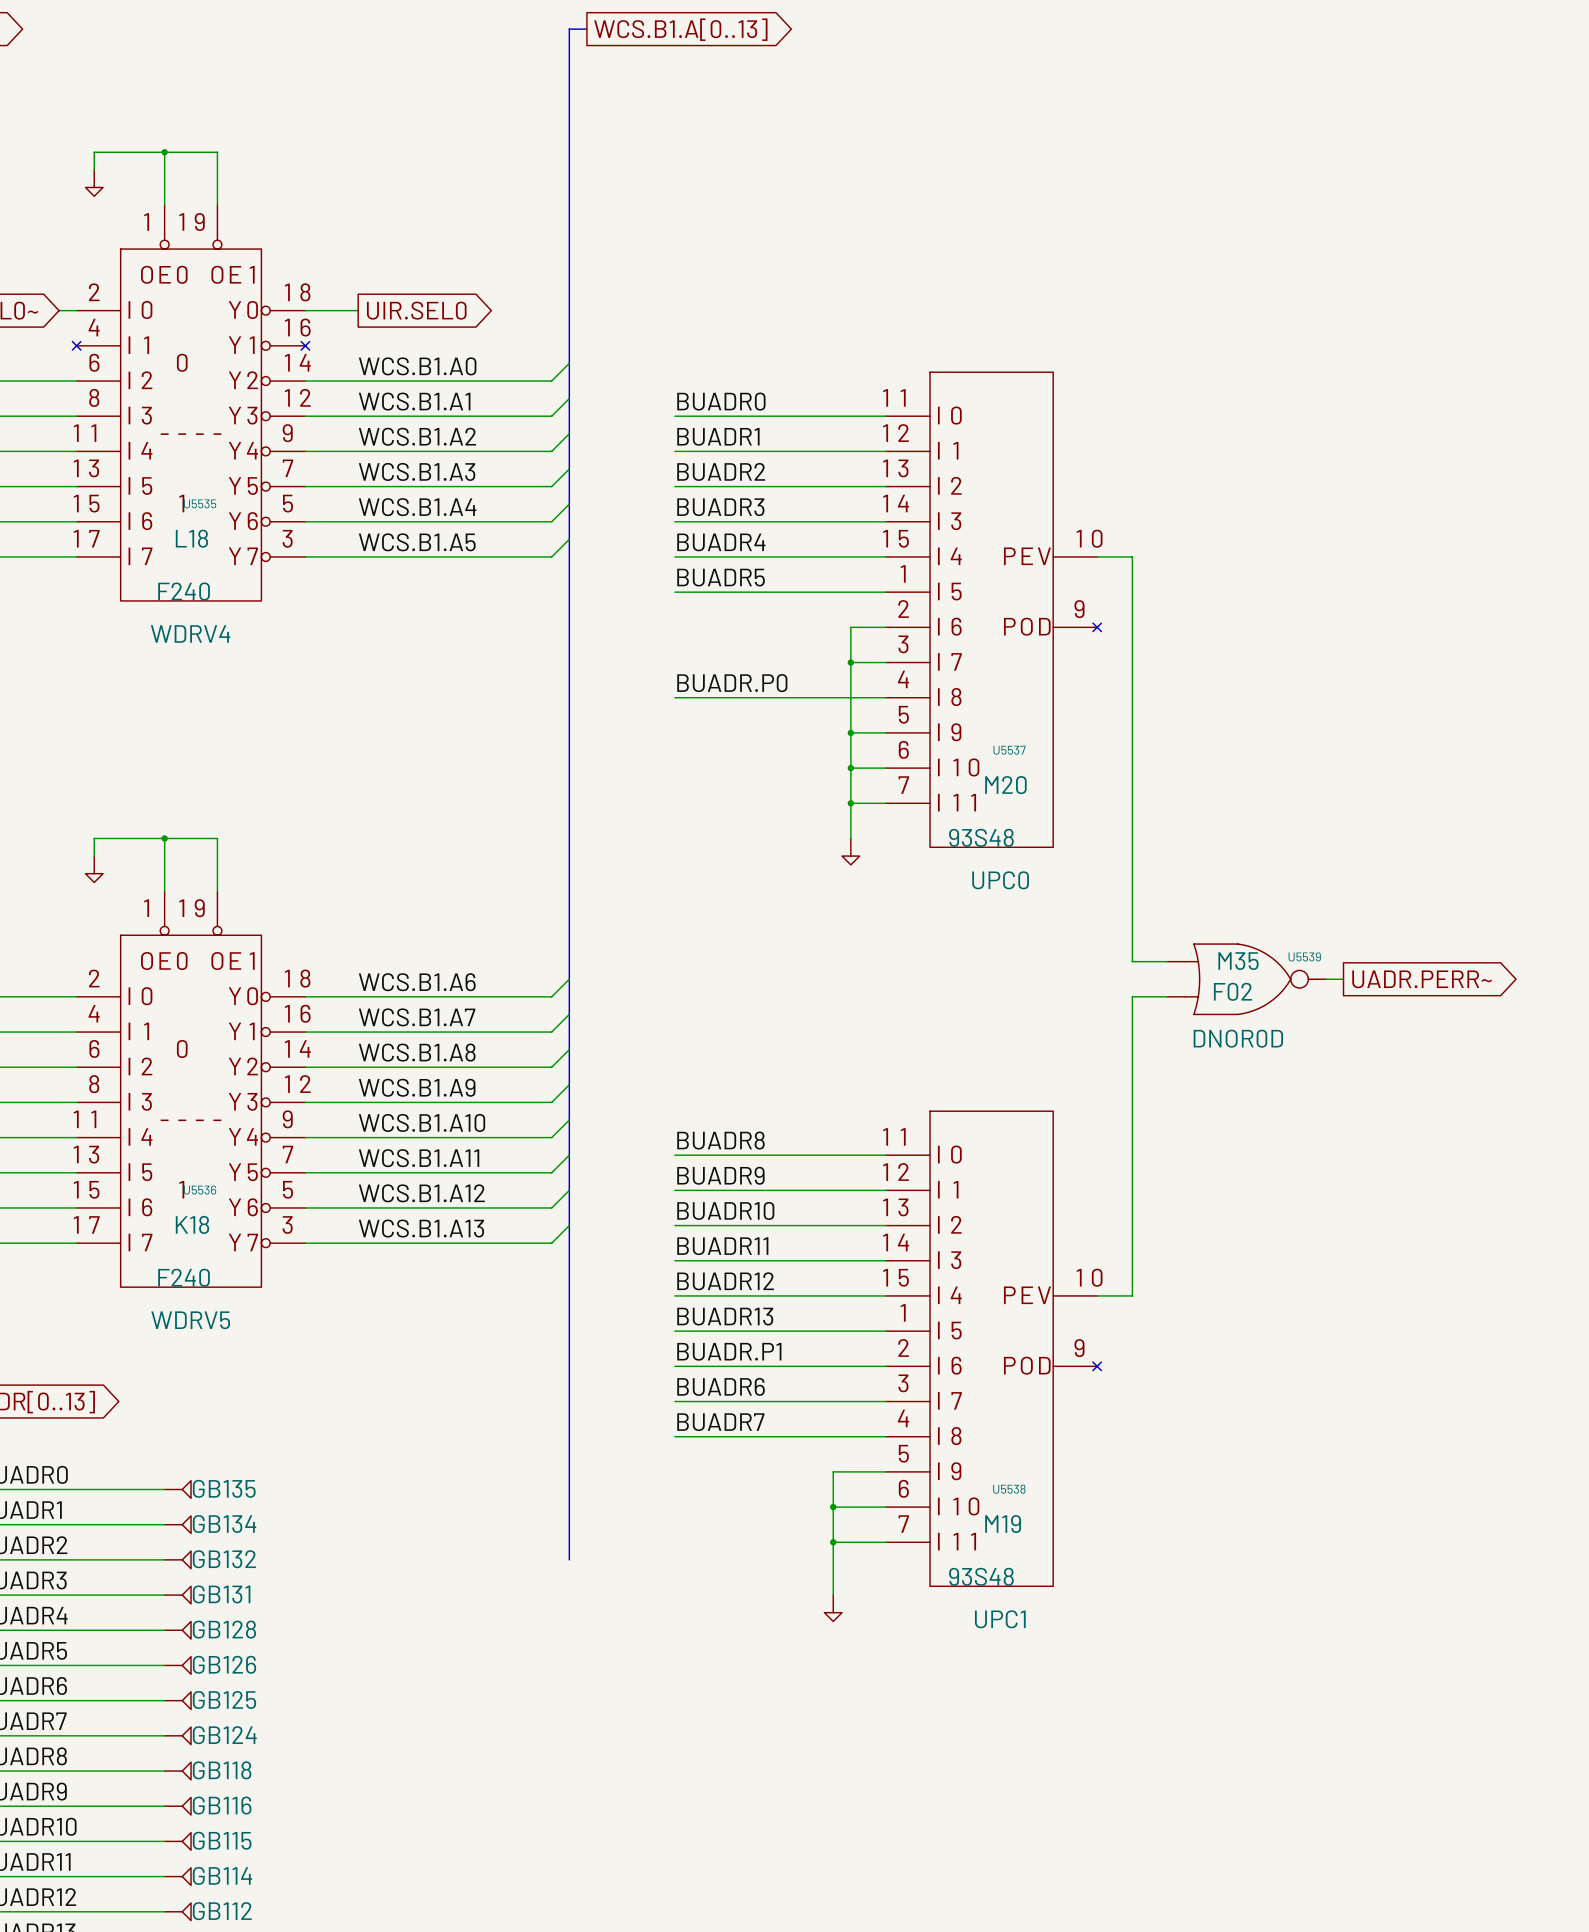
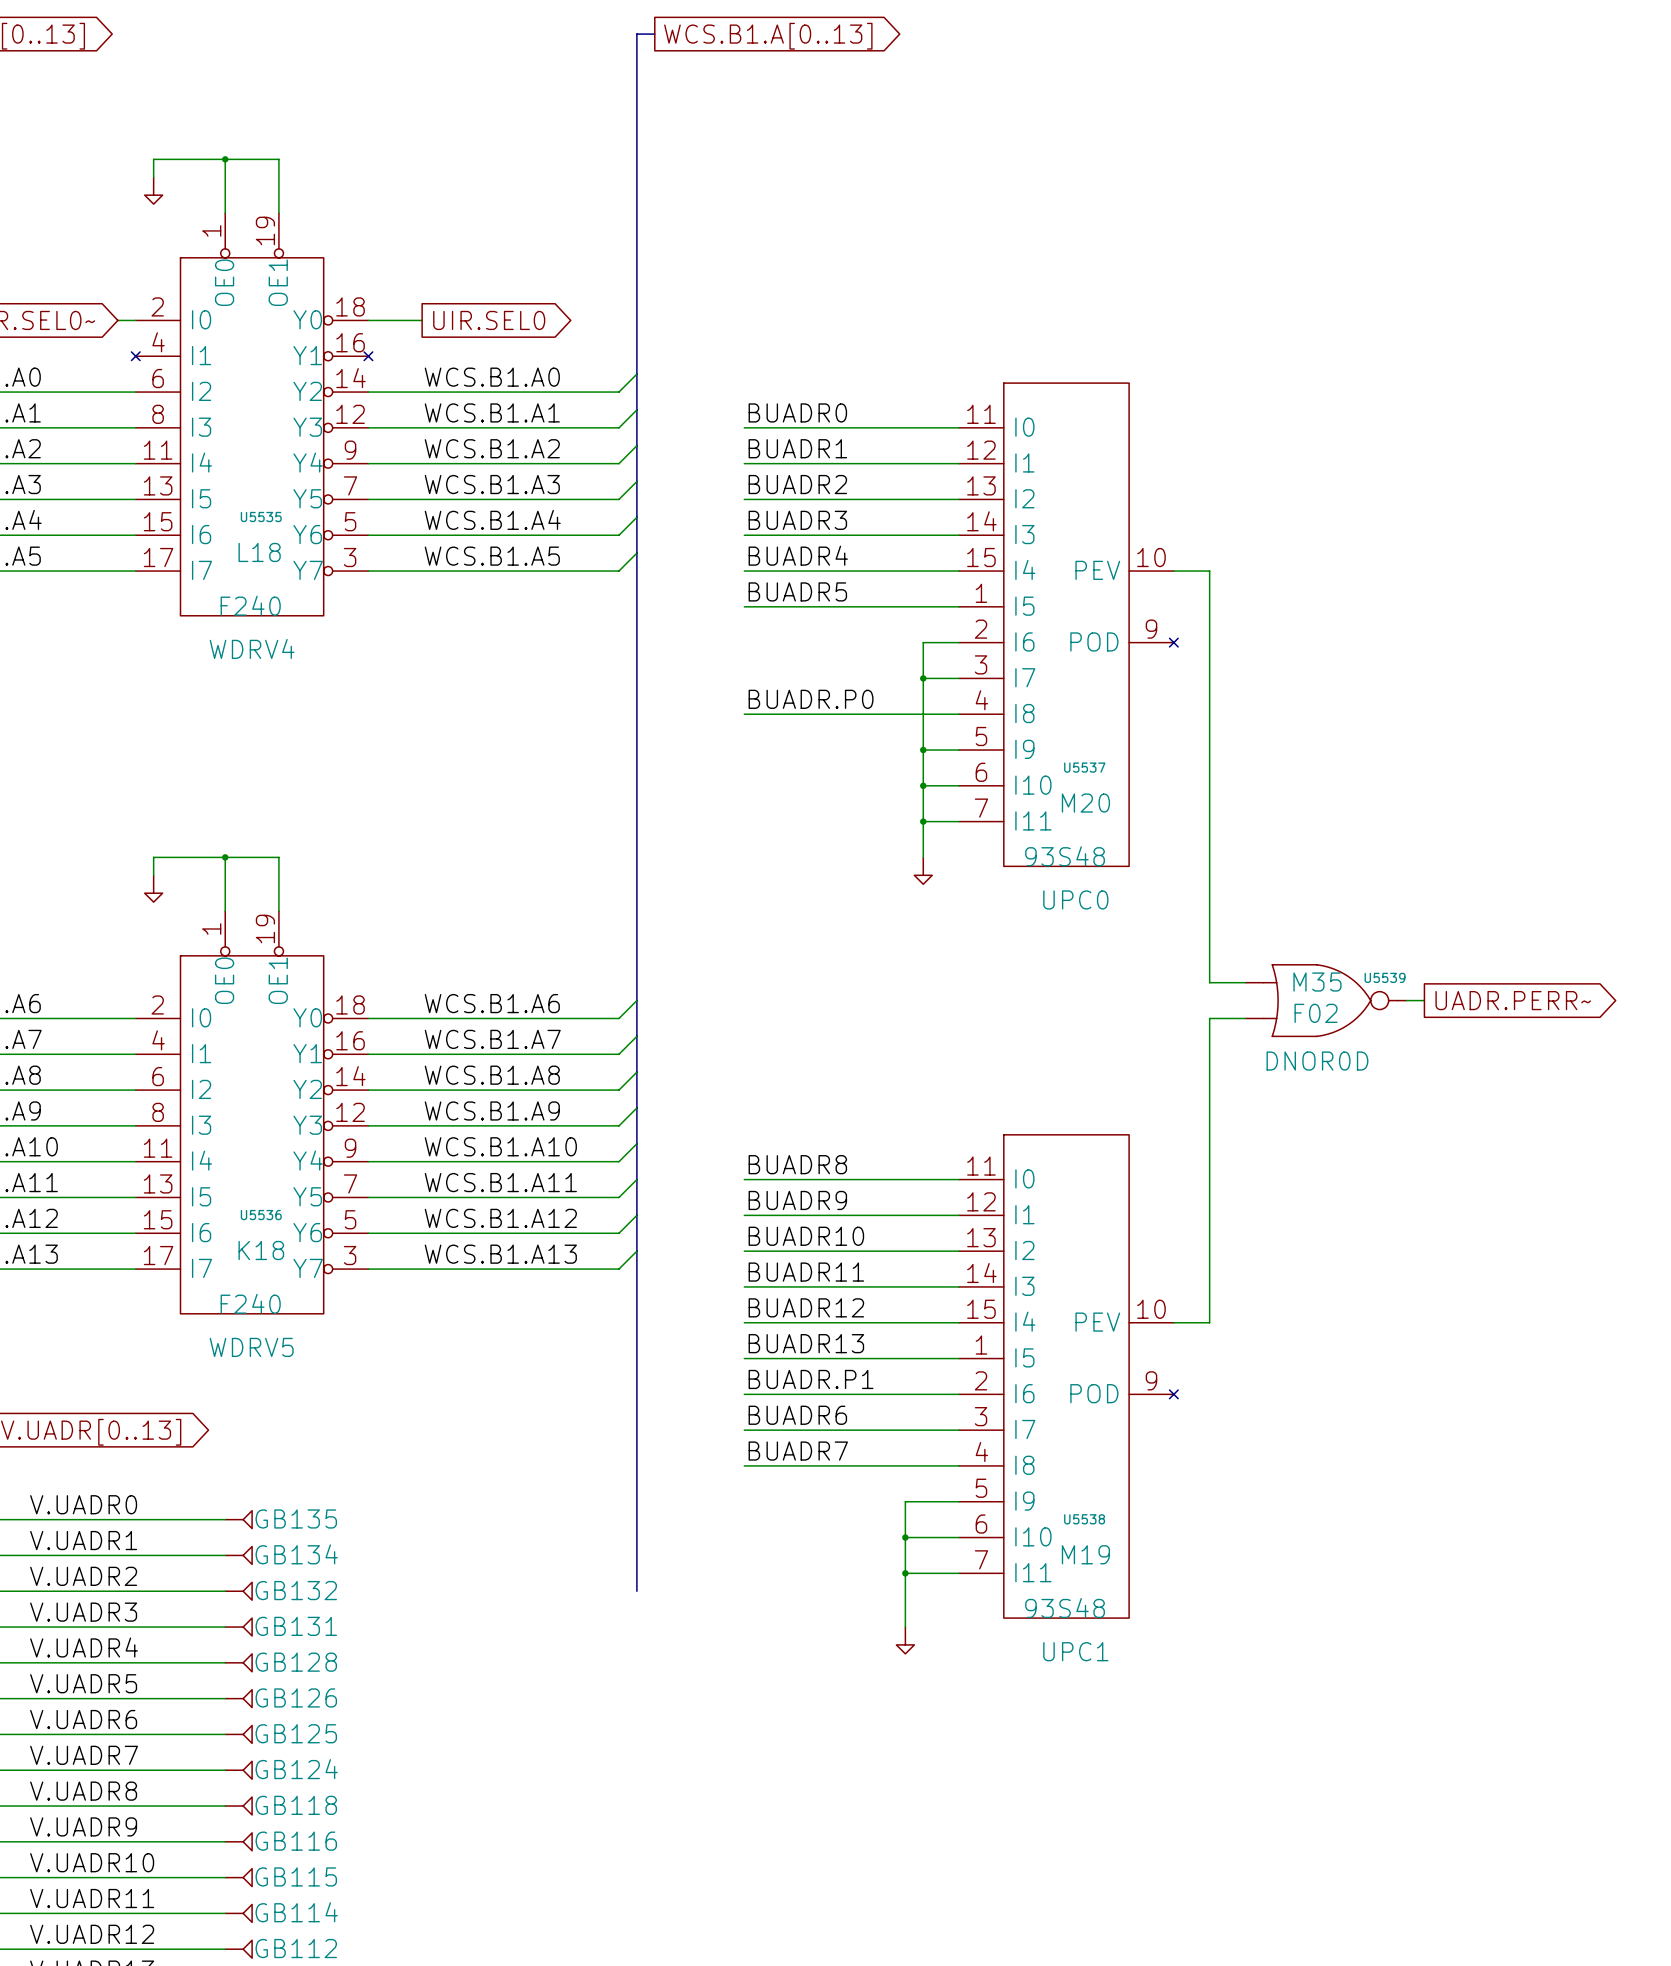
U5535 symbol: [76, 205, 306, 601] -> [135, 213, 369, 616]
U5537 symbol: [886, 372, 1098, 848] -> [959, 383, 1174, 867]
U5536 symbol: [76, 891, 306, 1288] -> [135, 911, 369, 1314]
U5538 symbol: [886, 1111, 1098, 1587] -> [959, 1134, 1174, 1619]

